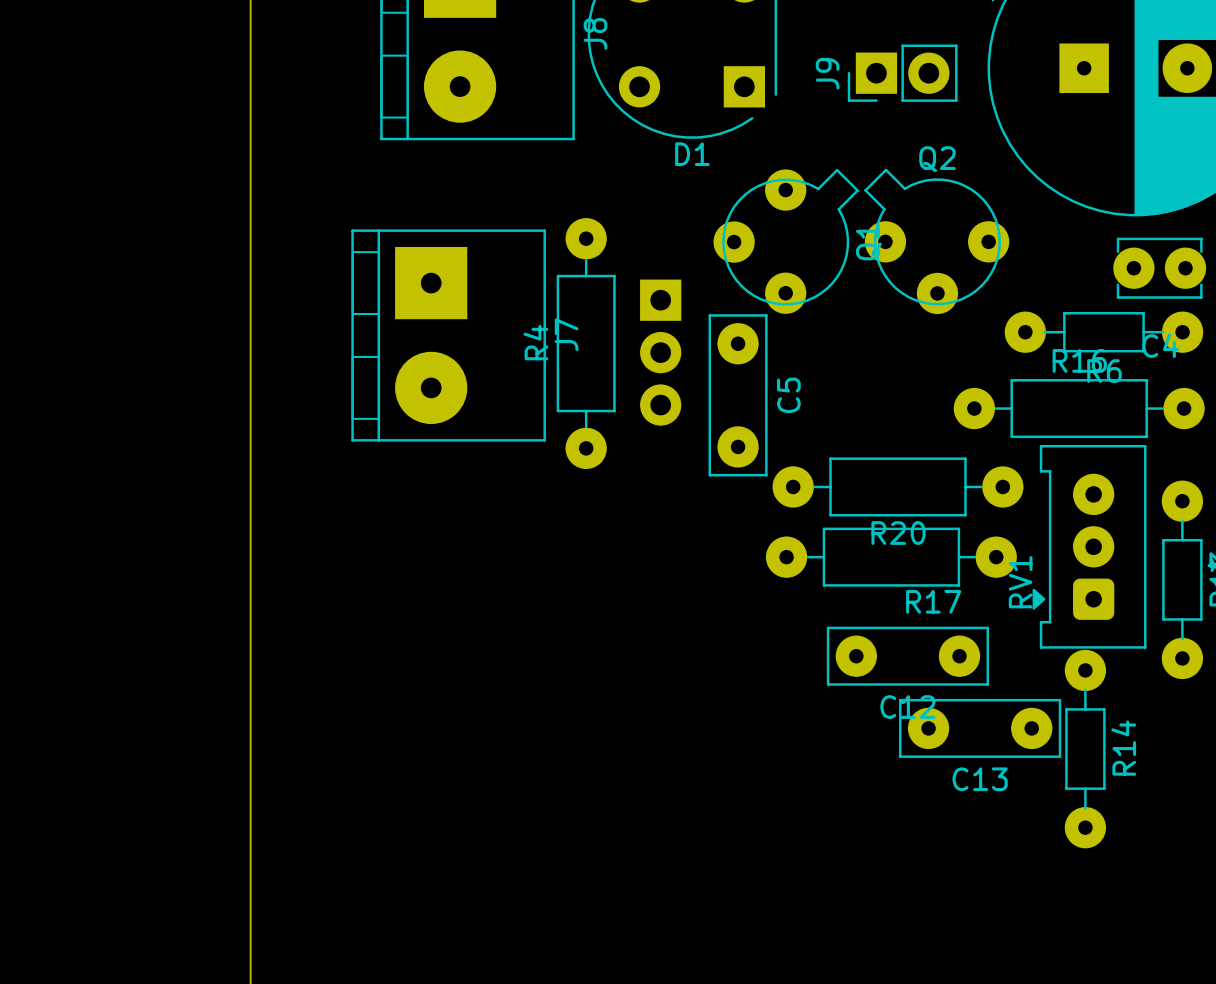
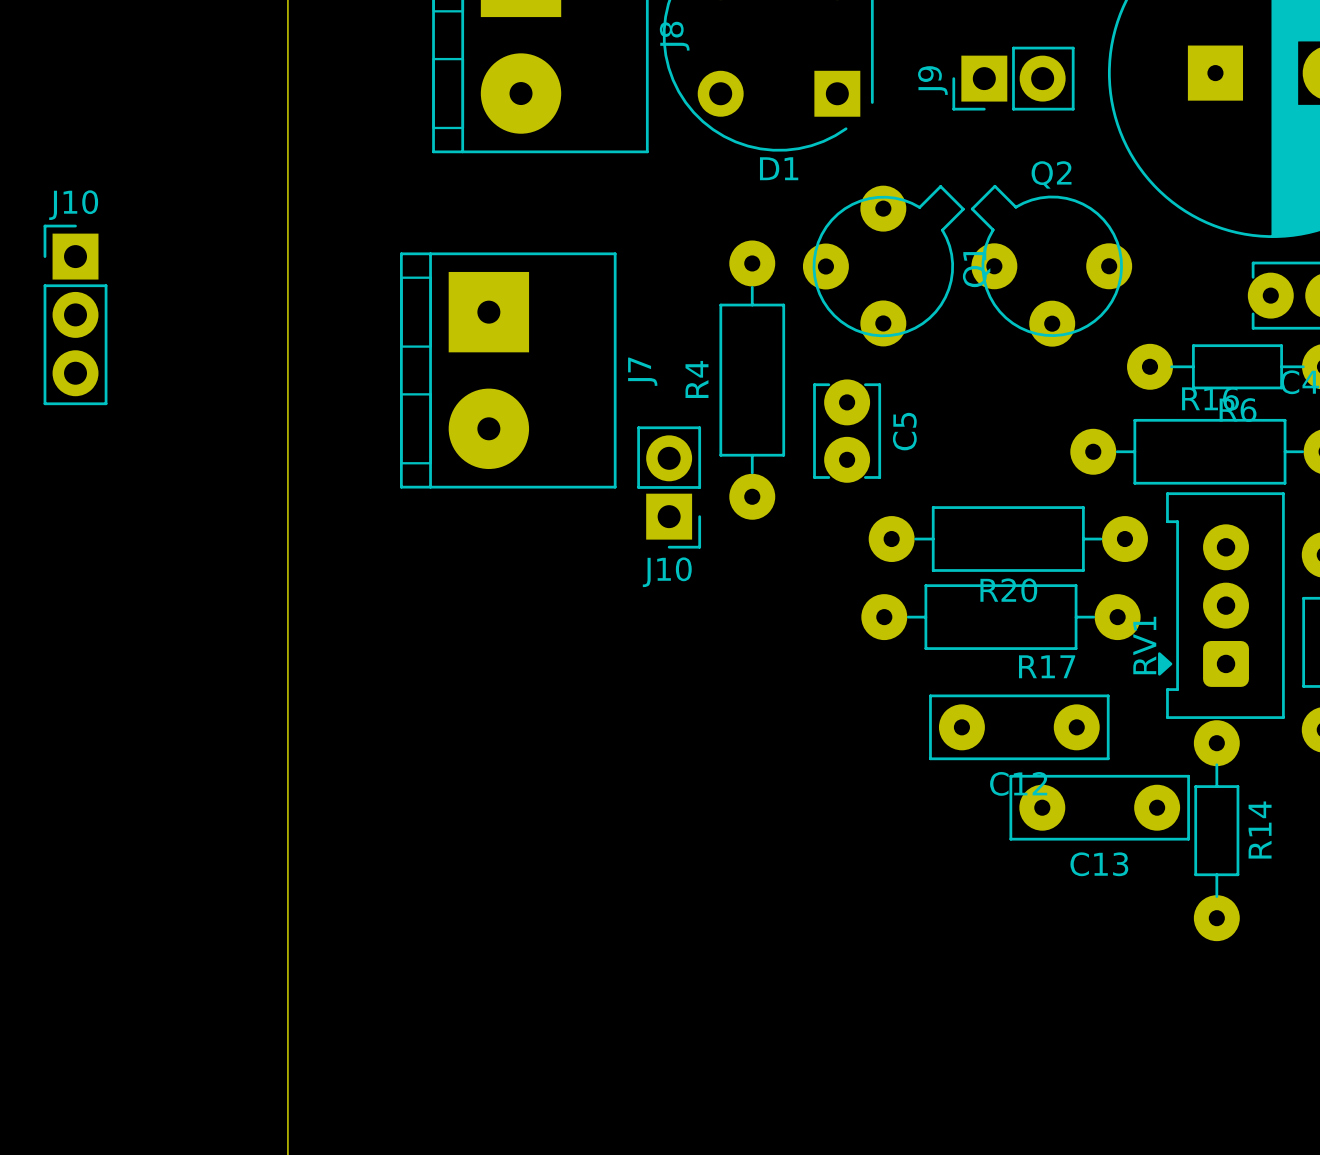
J10: none -> (75, 314)
C5 footprint: [708, 314, 768, 477] -> [813, 379, 882, 483]
R4 position: (586, 343) -> (752, 380)
part: (660, 352) -> none
J10: none -> (669, 487)

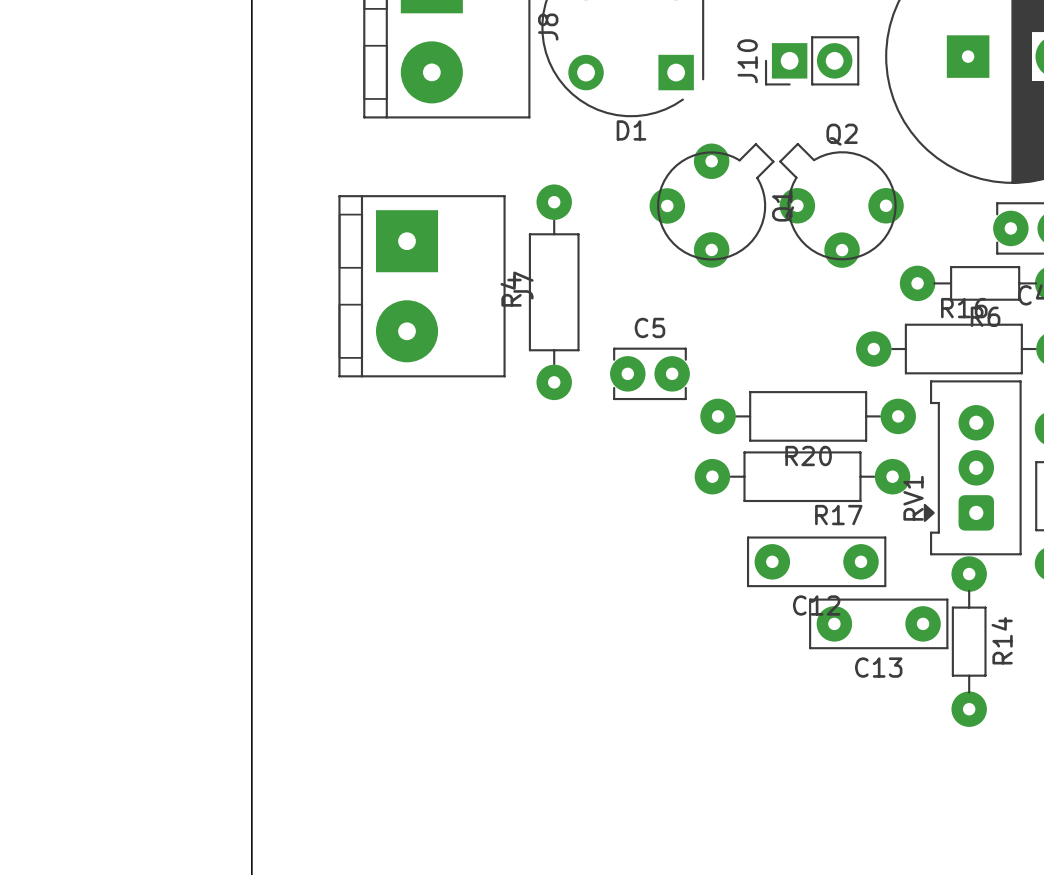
J9 name: J9 (932, 80) -> J10 (747, 61)
J10: (75, 314) -> none
R4 position: (752, 380) -> (554, 292)
C5 rotation: 0° (847, 431) -> 90° clockwise (649, 373)
C5 position: (847, 431) -> (649, 373)
C5 name position: C5 (904, 431) -> C5 (649, 327)
J10: (669, 487) -> none

